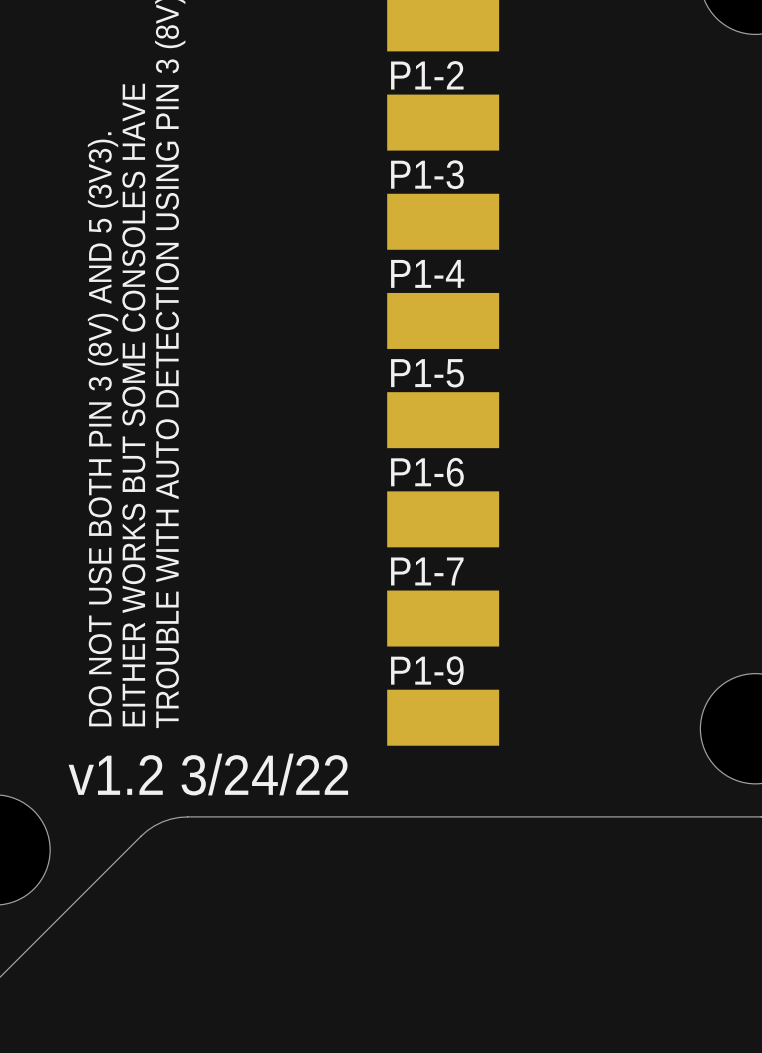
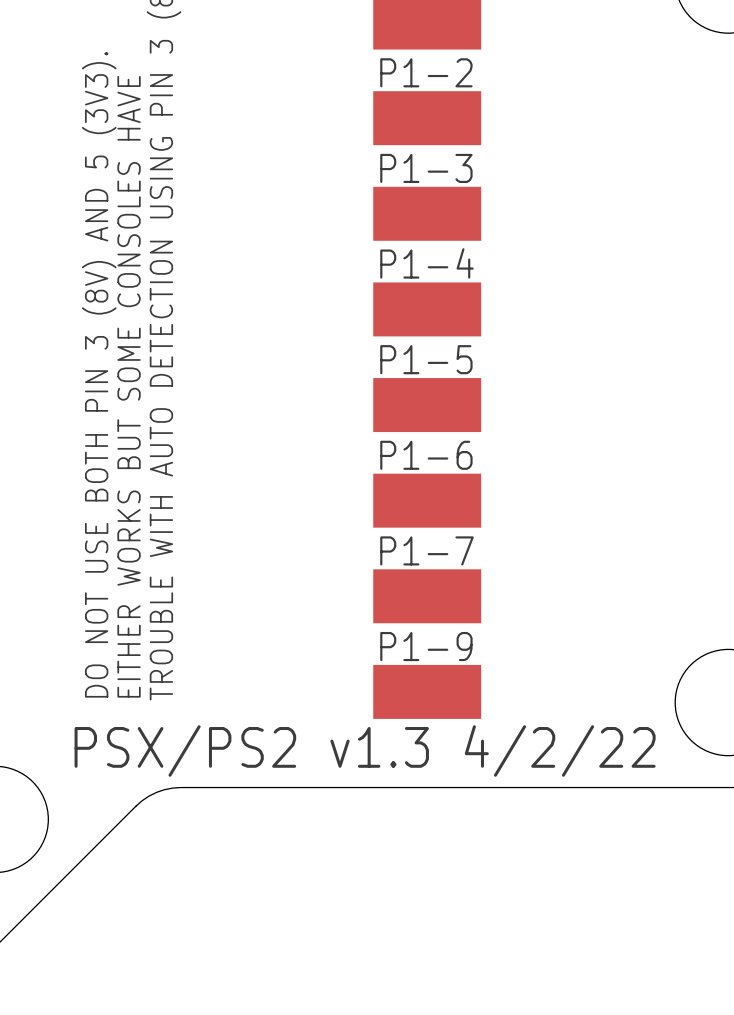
text: v1.2 3/24/22 (208, 774) -> PSX/PS2 v1.3 4/2/22 (365, 750)

